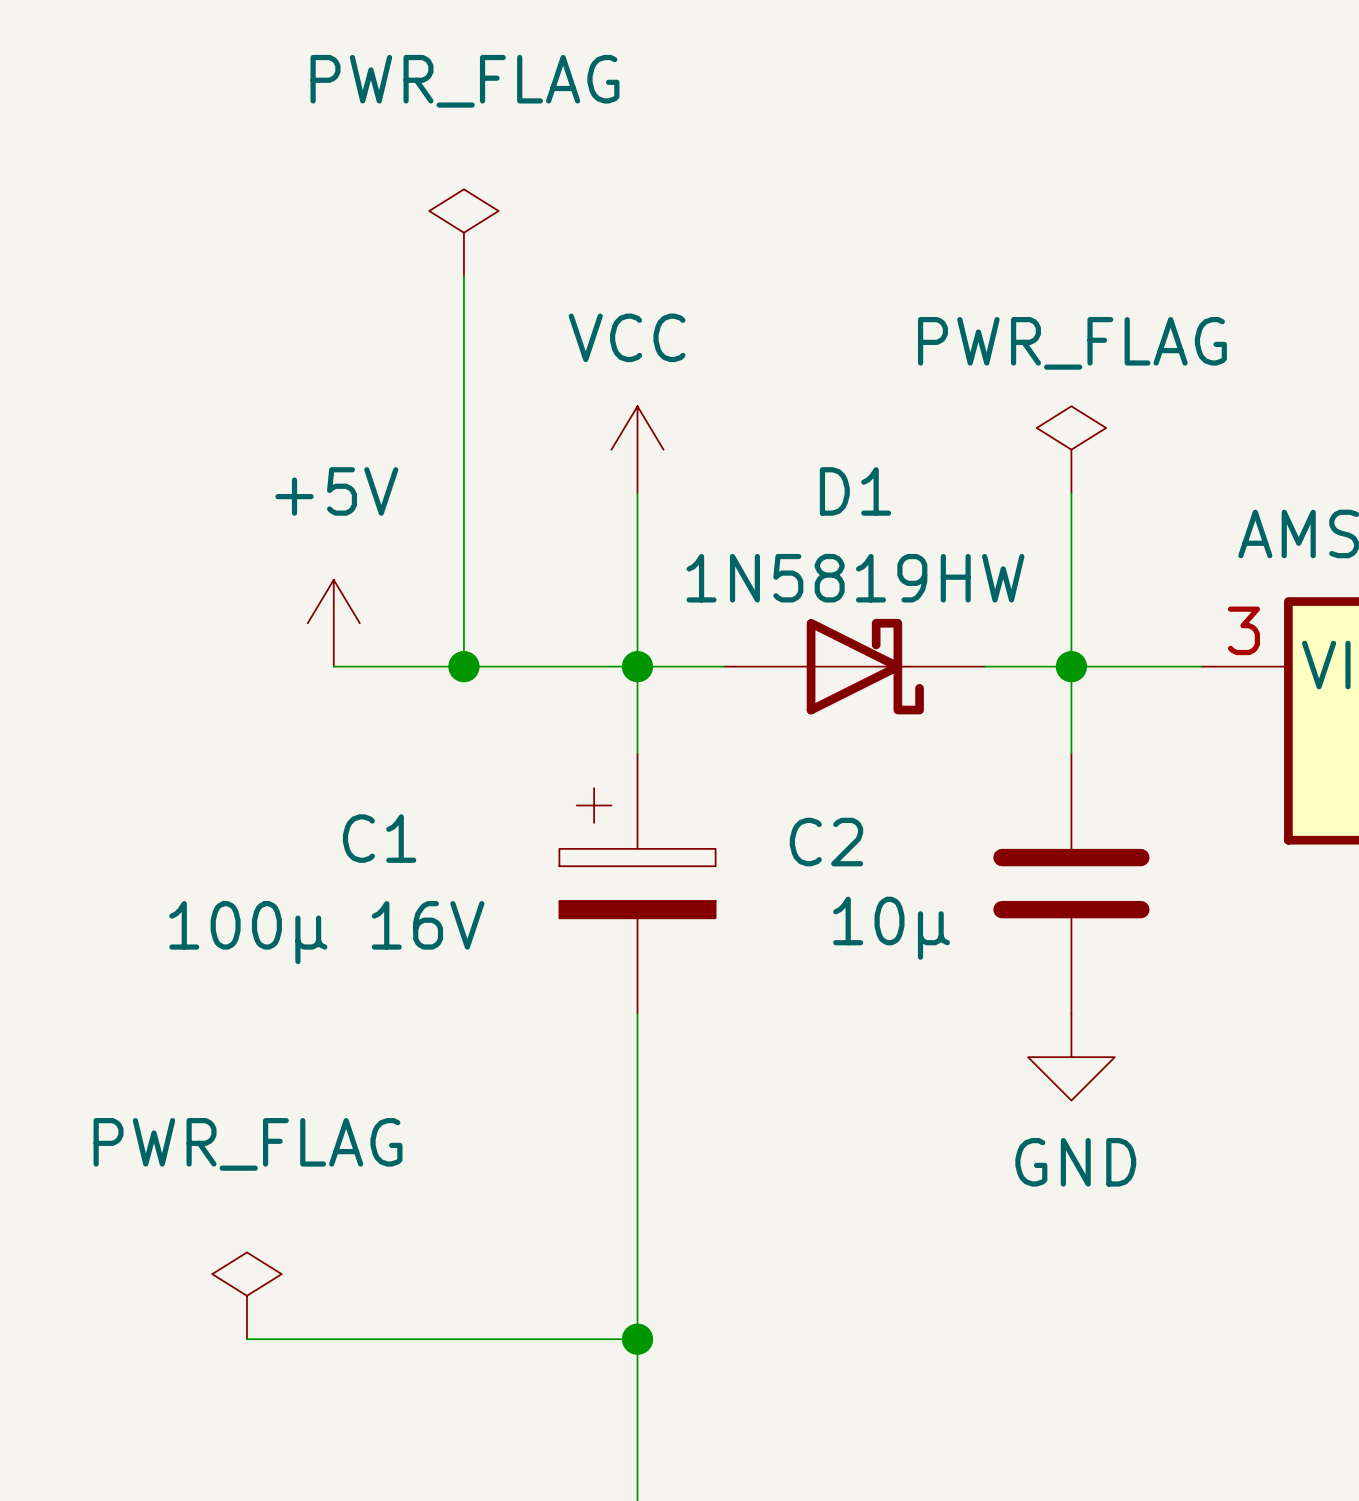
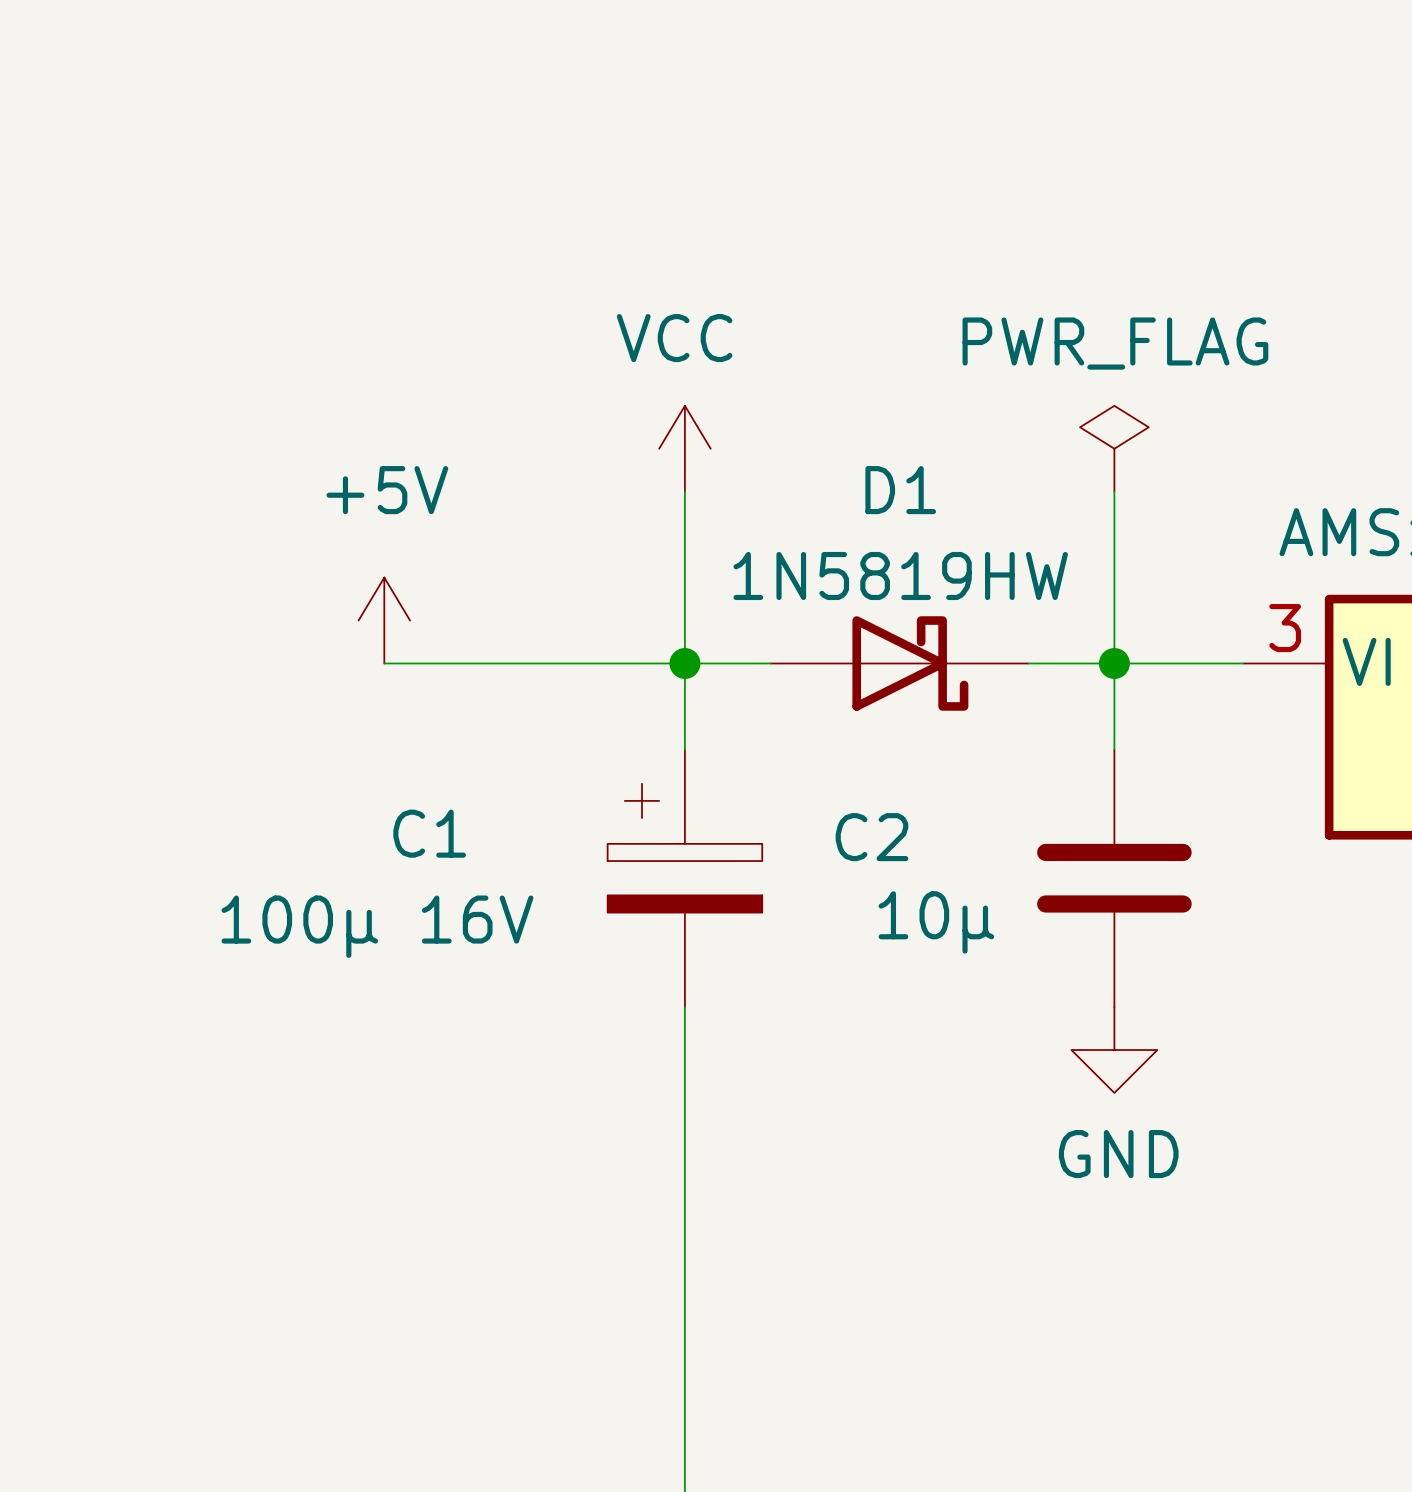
power symbol: PWR_FLAG (463, 232) -> none
wire: (463, 276) (463, 666) -> none
junction: (463, 666) -> none
power symbol: PWR_FLAG (246, 1295) -> none
wire: (246, 1339) (637, 1339) -> none
junction: (637, 1339) -> none

